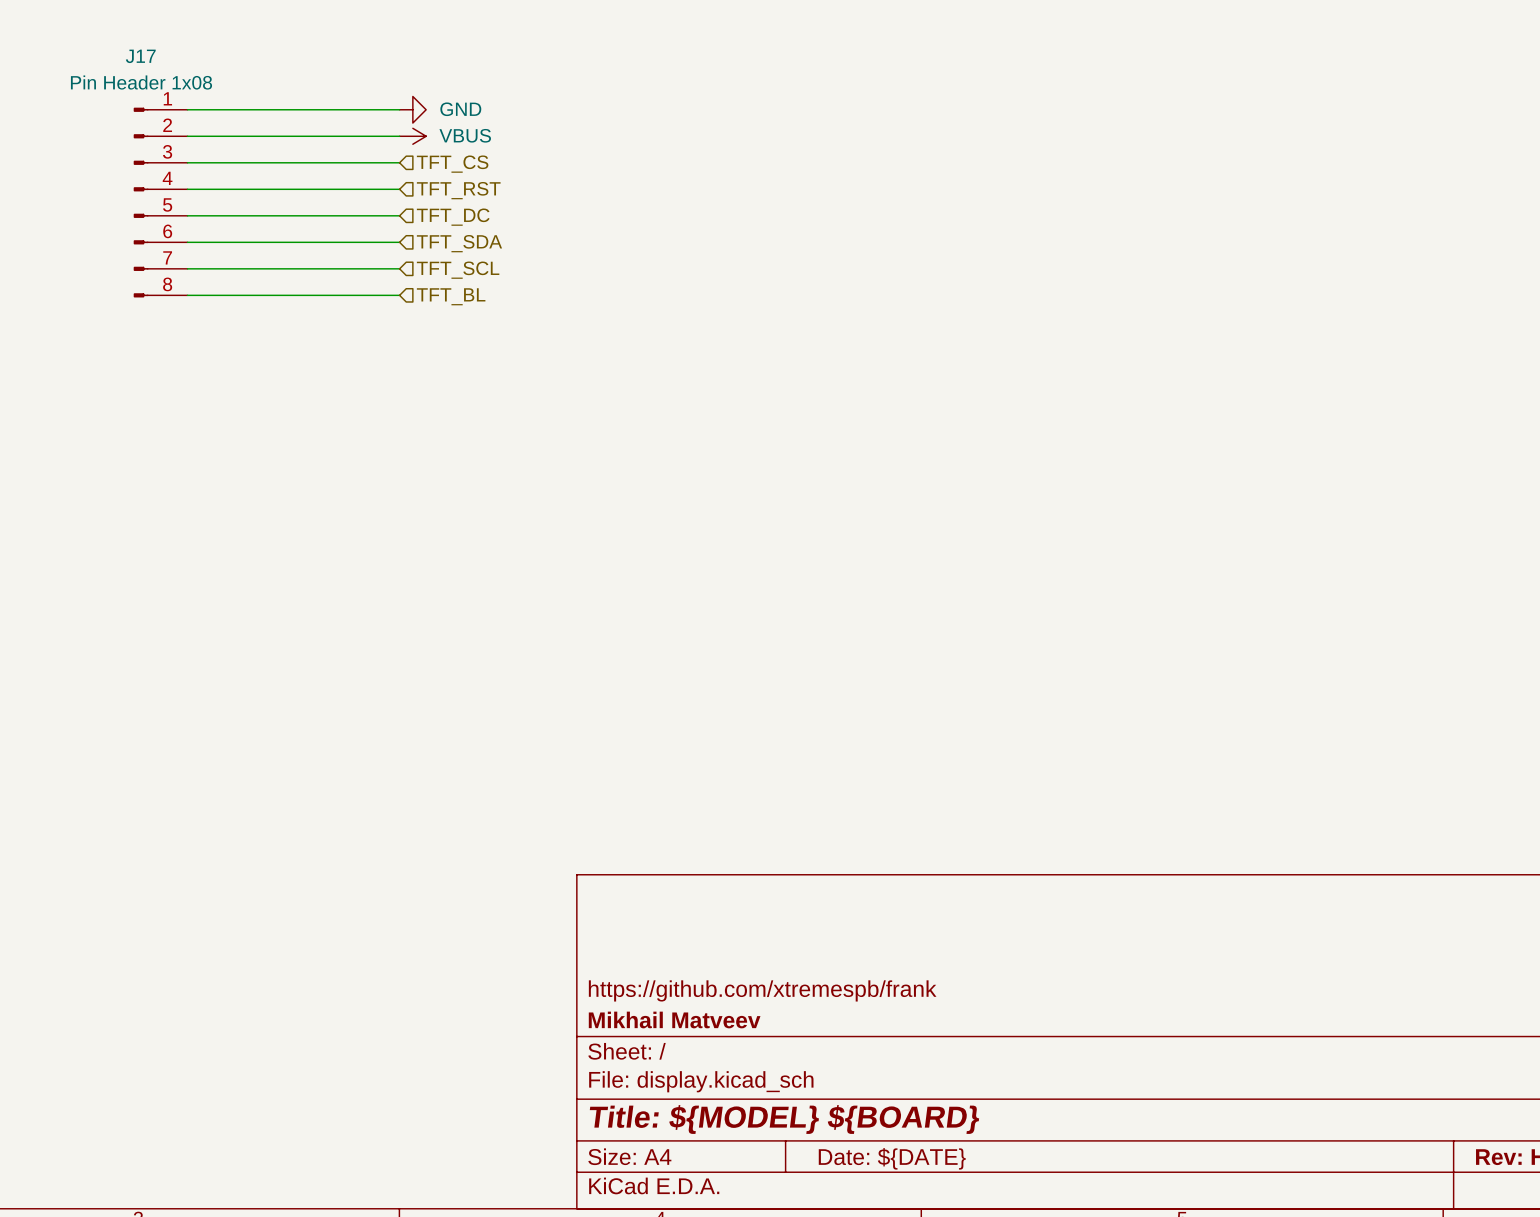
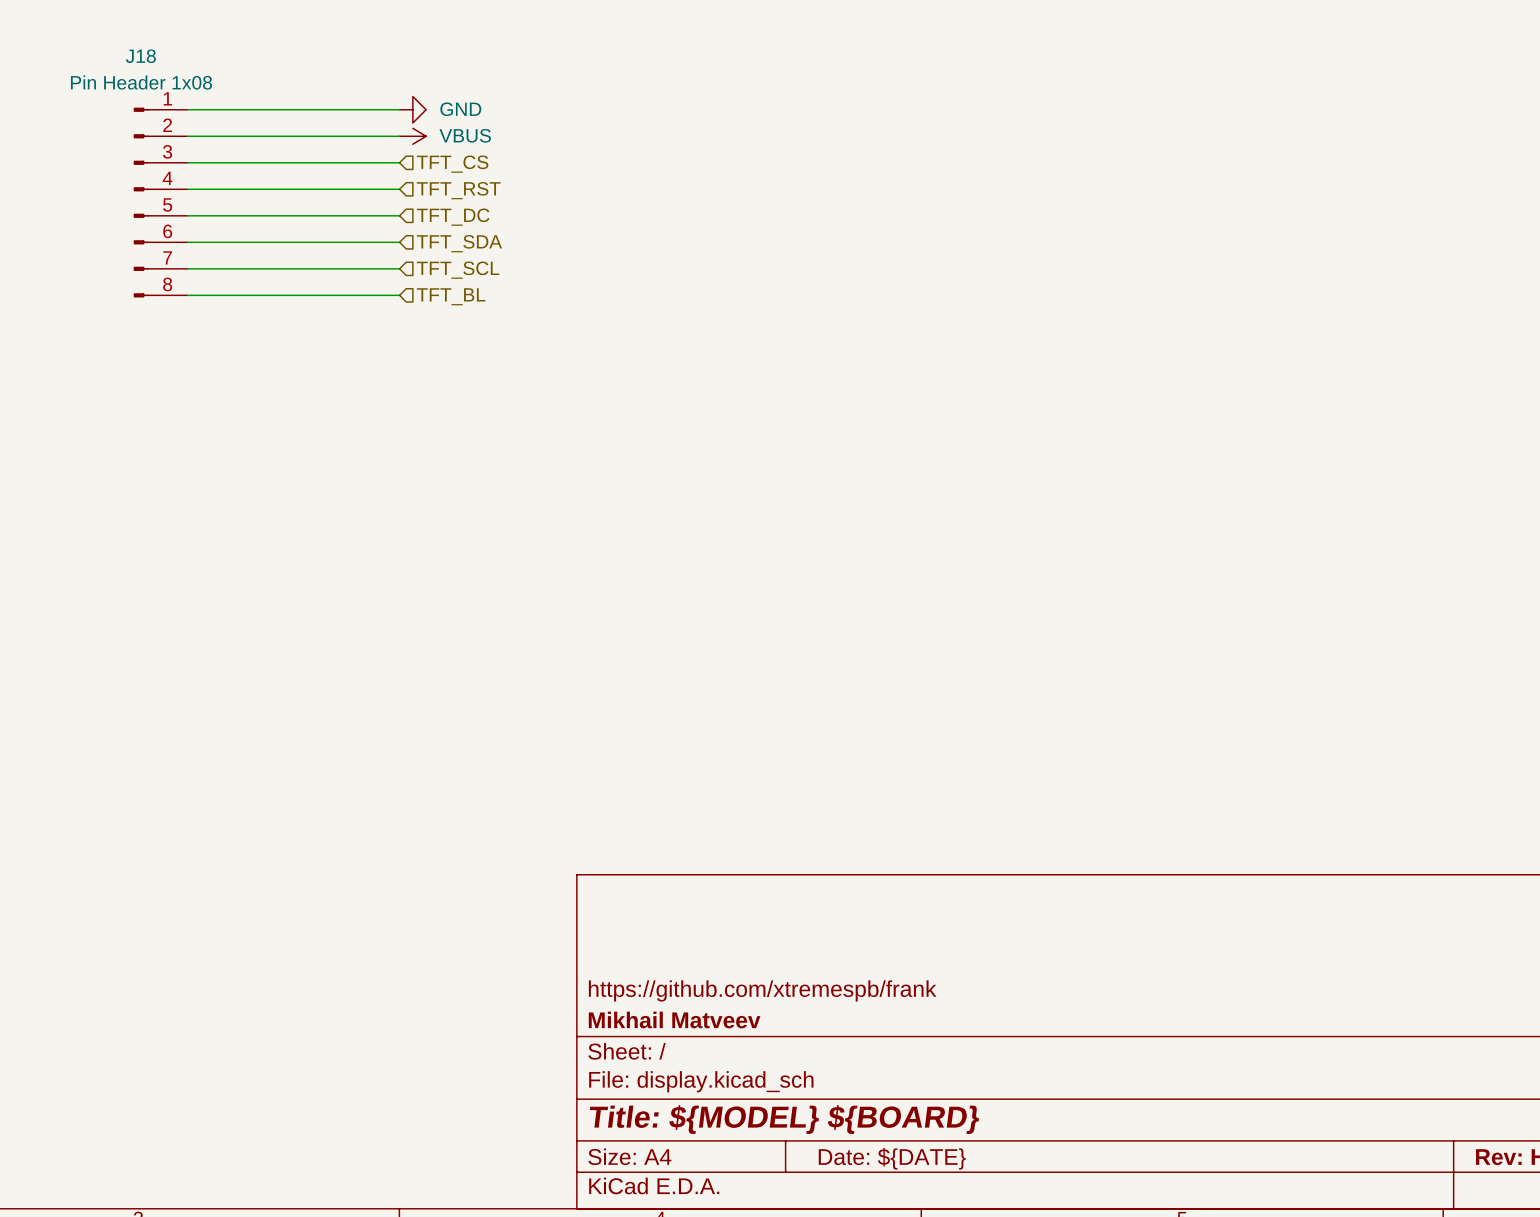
J17 name: J17 (140, 56) -> J18 (140, 56)

